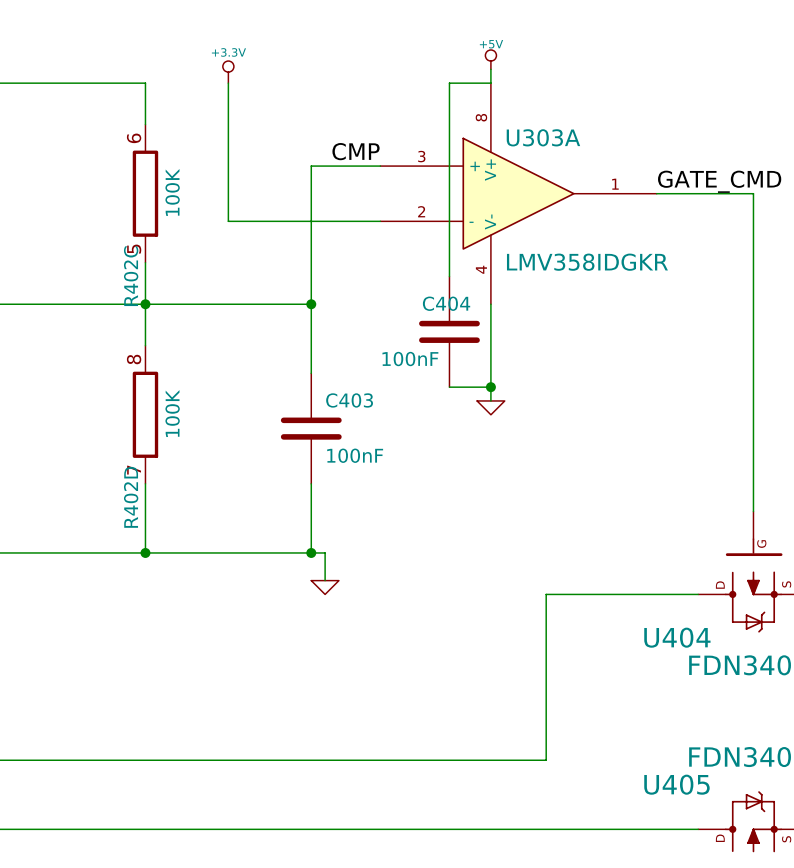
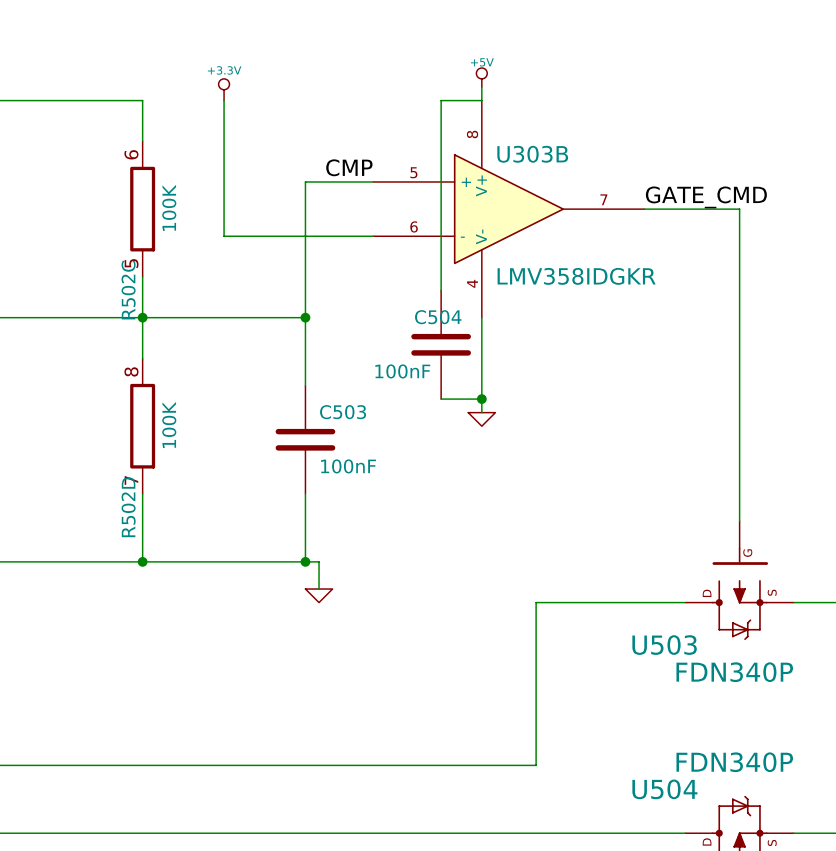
U303A name: U303A (543, 137) -> U303B (532, 154)
U303A pin number: 3 (421, 156) -> 5 (413, 172)
U303A pin number: 1 (615, 184) -> 7 (603, 199)
U303A pin number: 2 (421, 211) -> 6 (414, 226)
R402C name: R402C (131, 276) -> R502C (128, 290)
C404 name: C404 (446, 303) -> C504 (438, 317)
C403 name: C403 (349, 400) -> C503 (343, 412)
R402D name: R402D (131, 497) -> R502D (128, 507)
U404 name: U404 (677, 637) -> U503 (664, 645)
U405 name: U405 (676, 784) -> U504 (664, 789)

